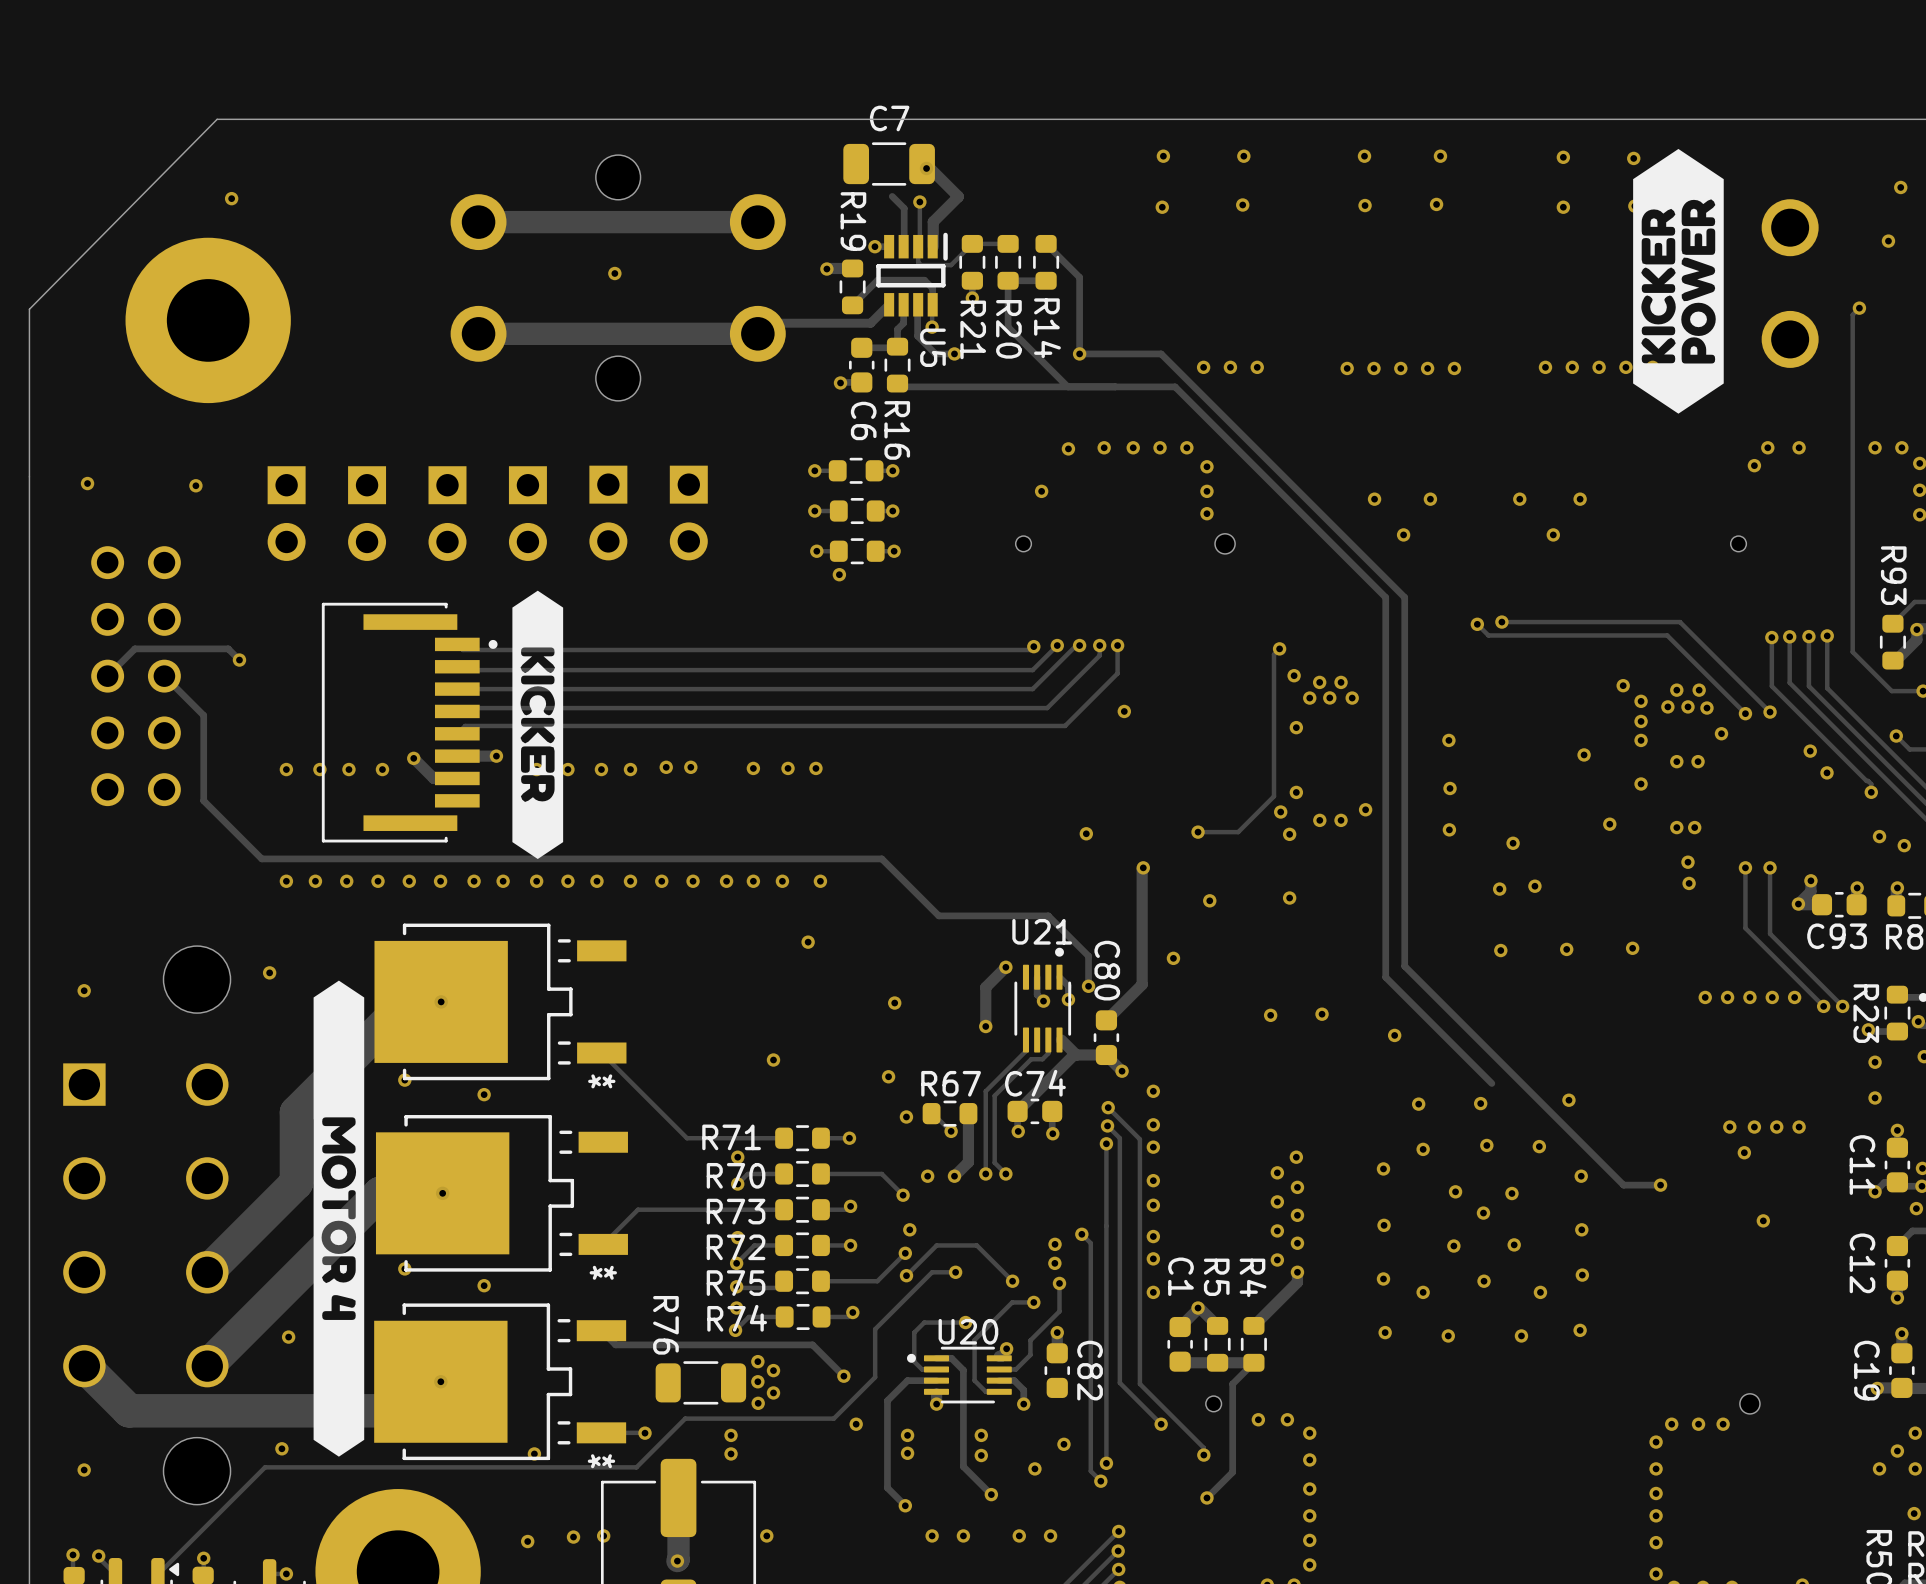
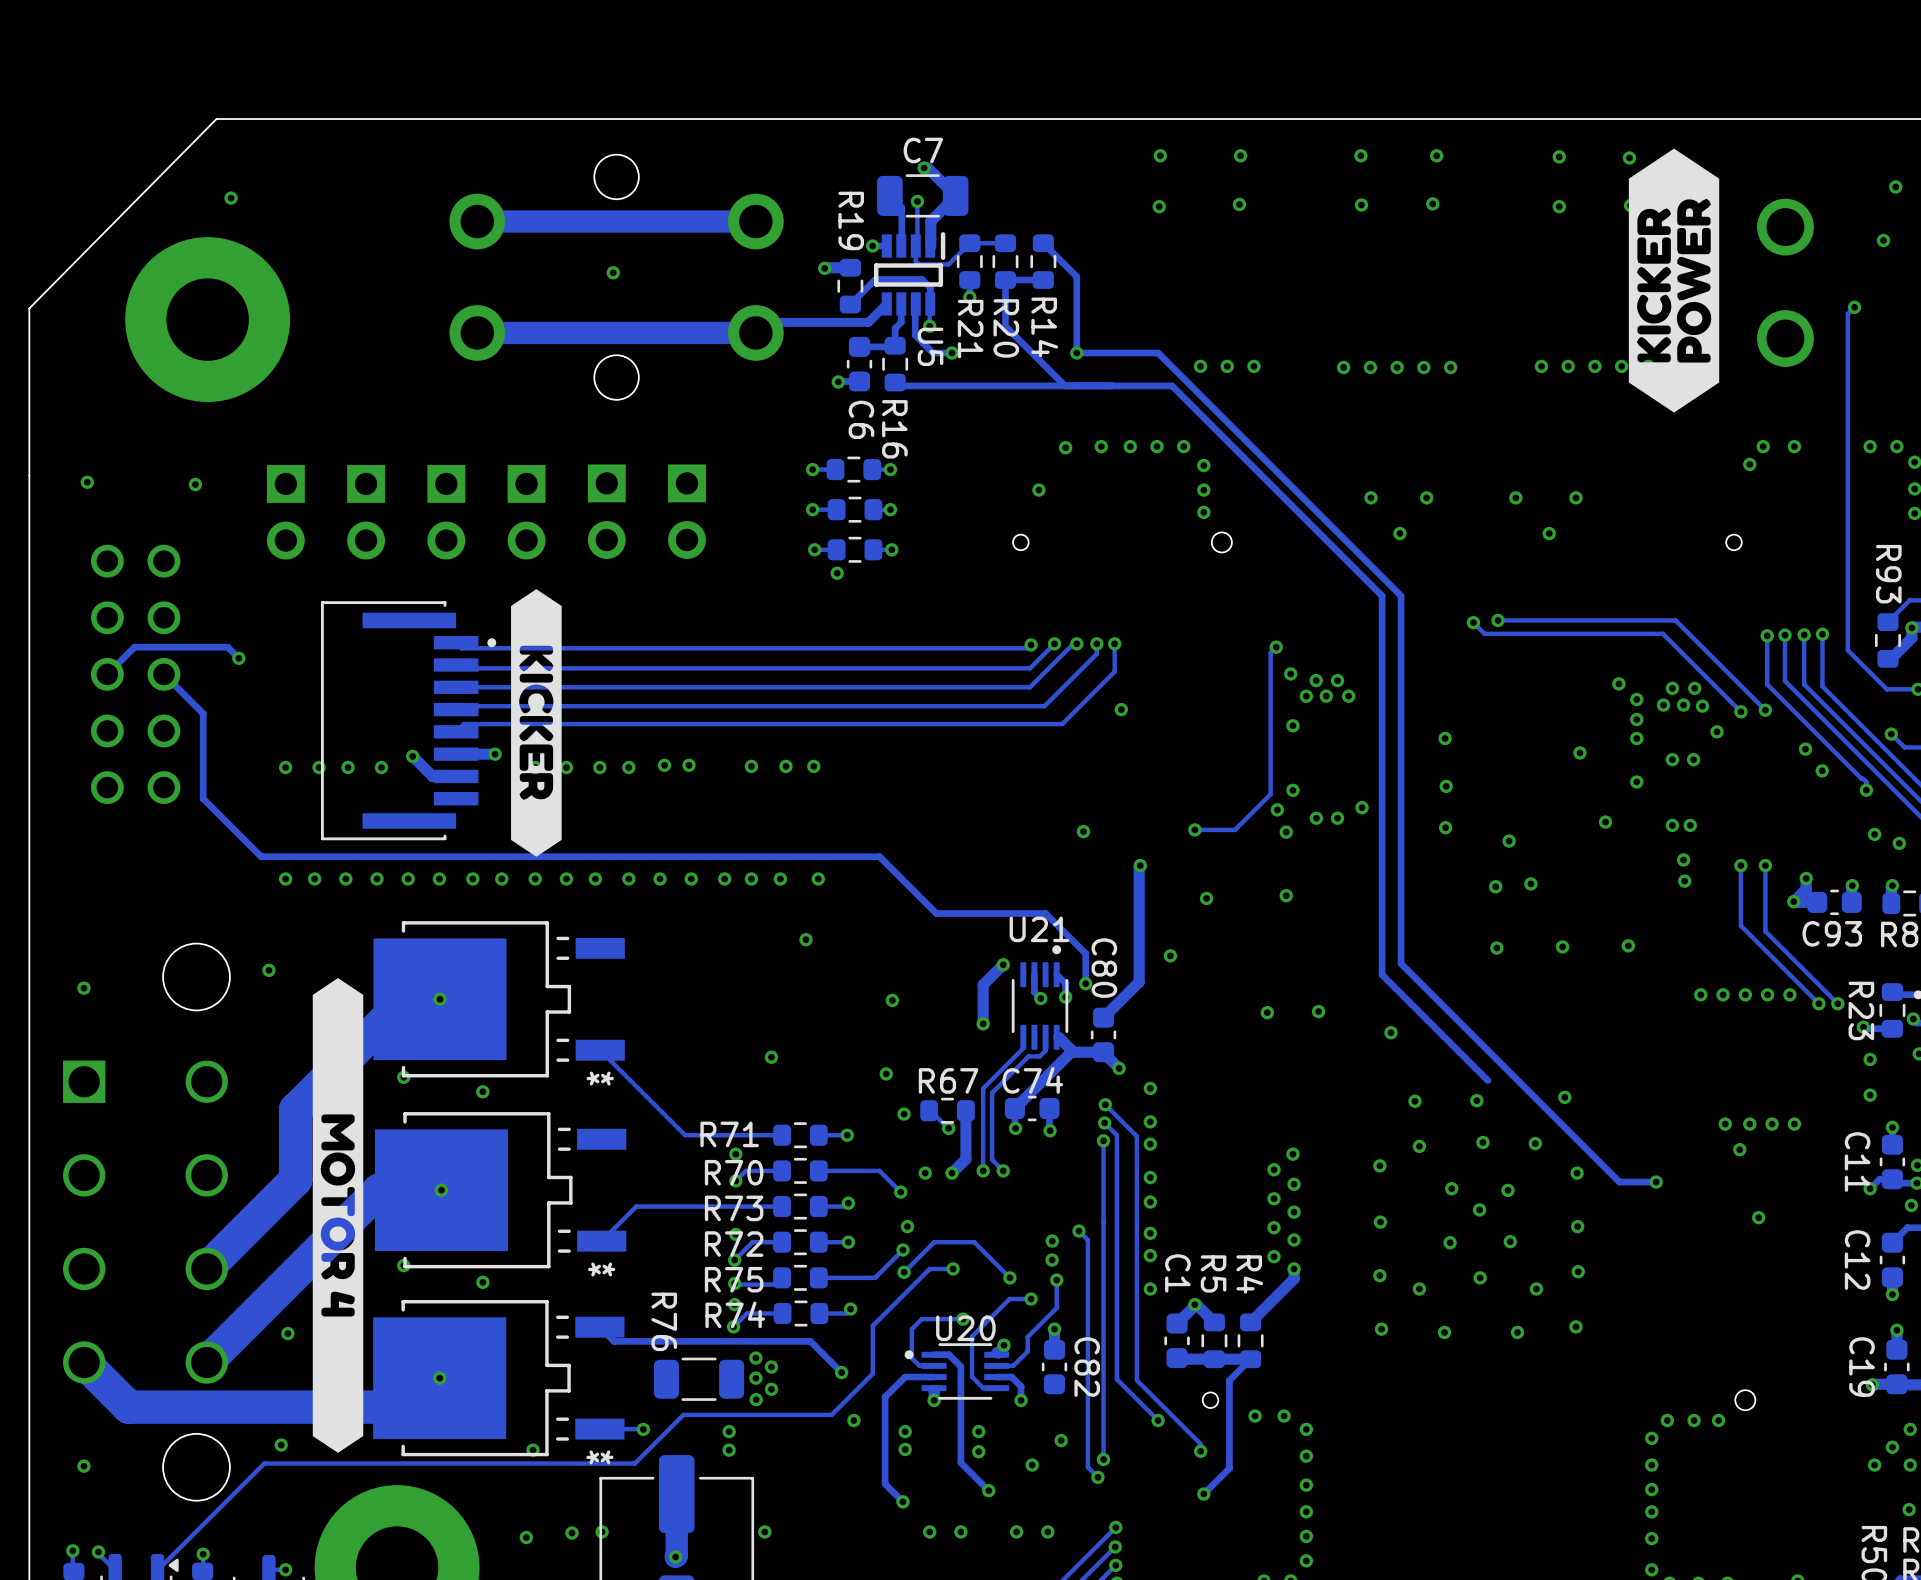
C7 position: (889, 164) -> (922, 195)

